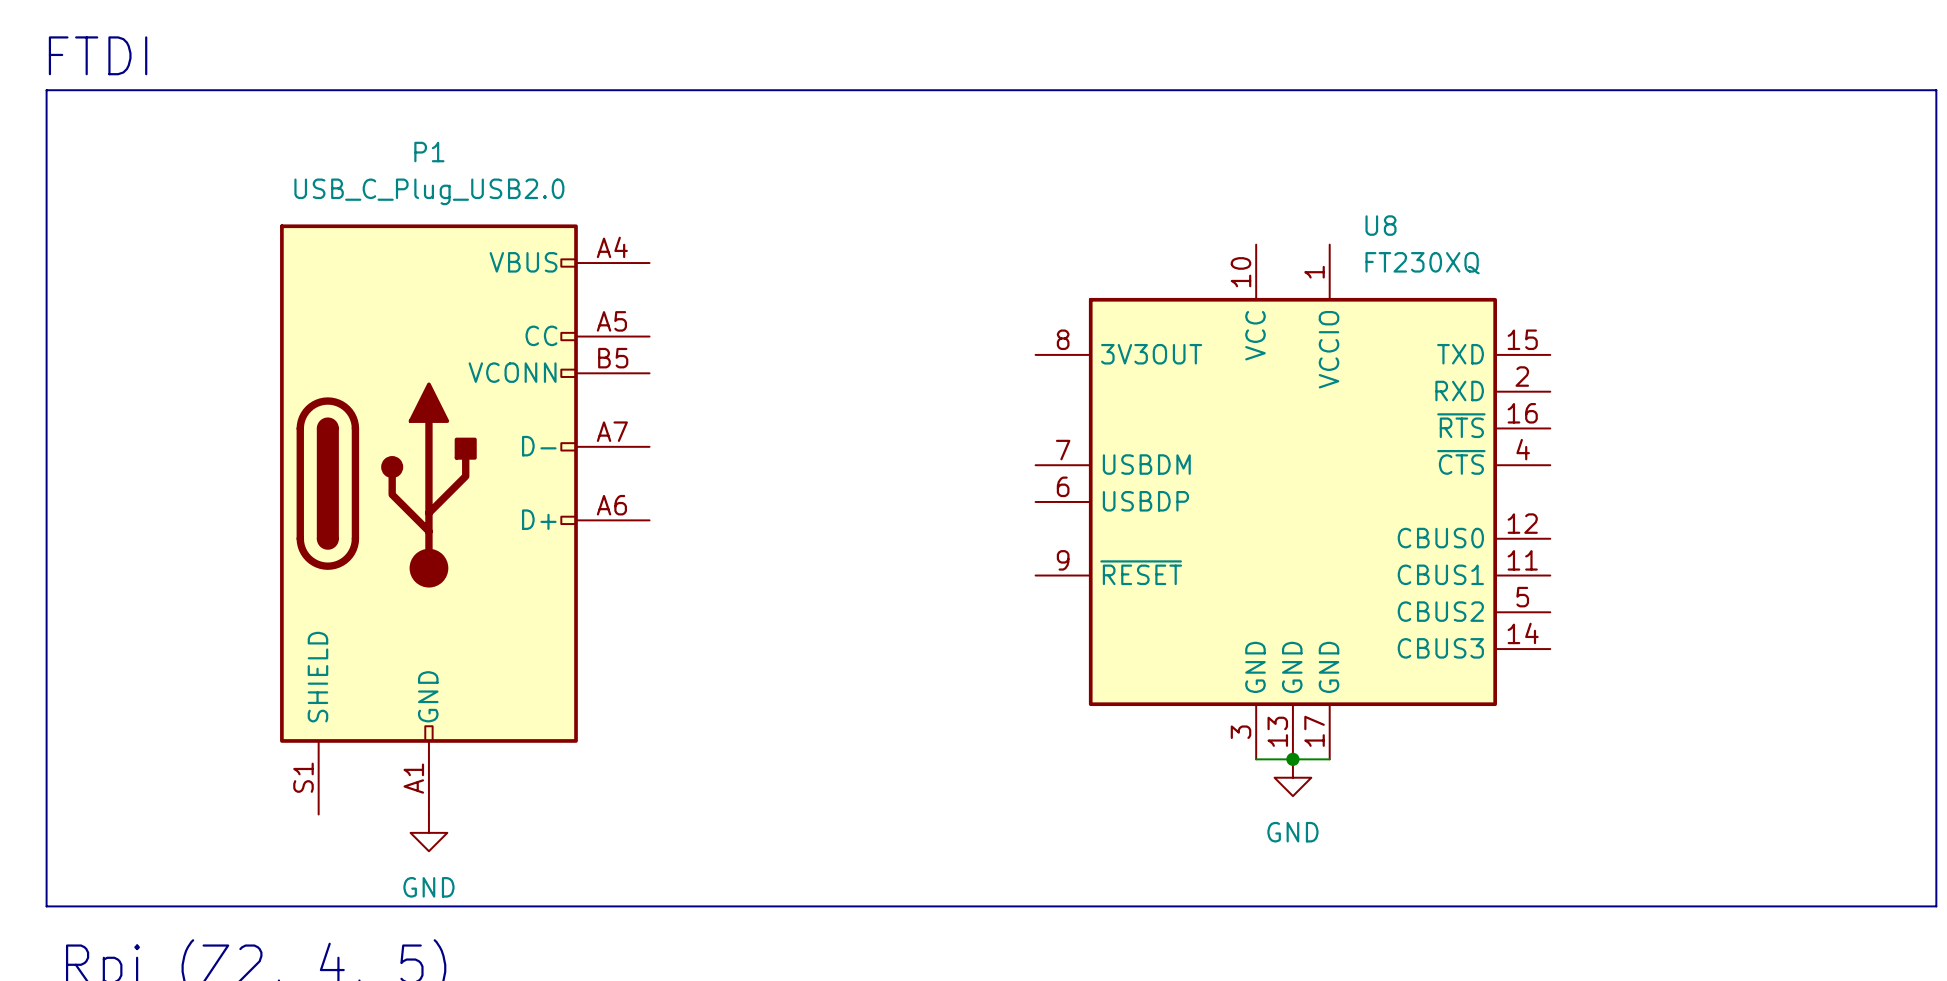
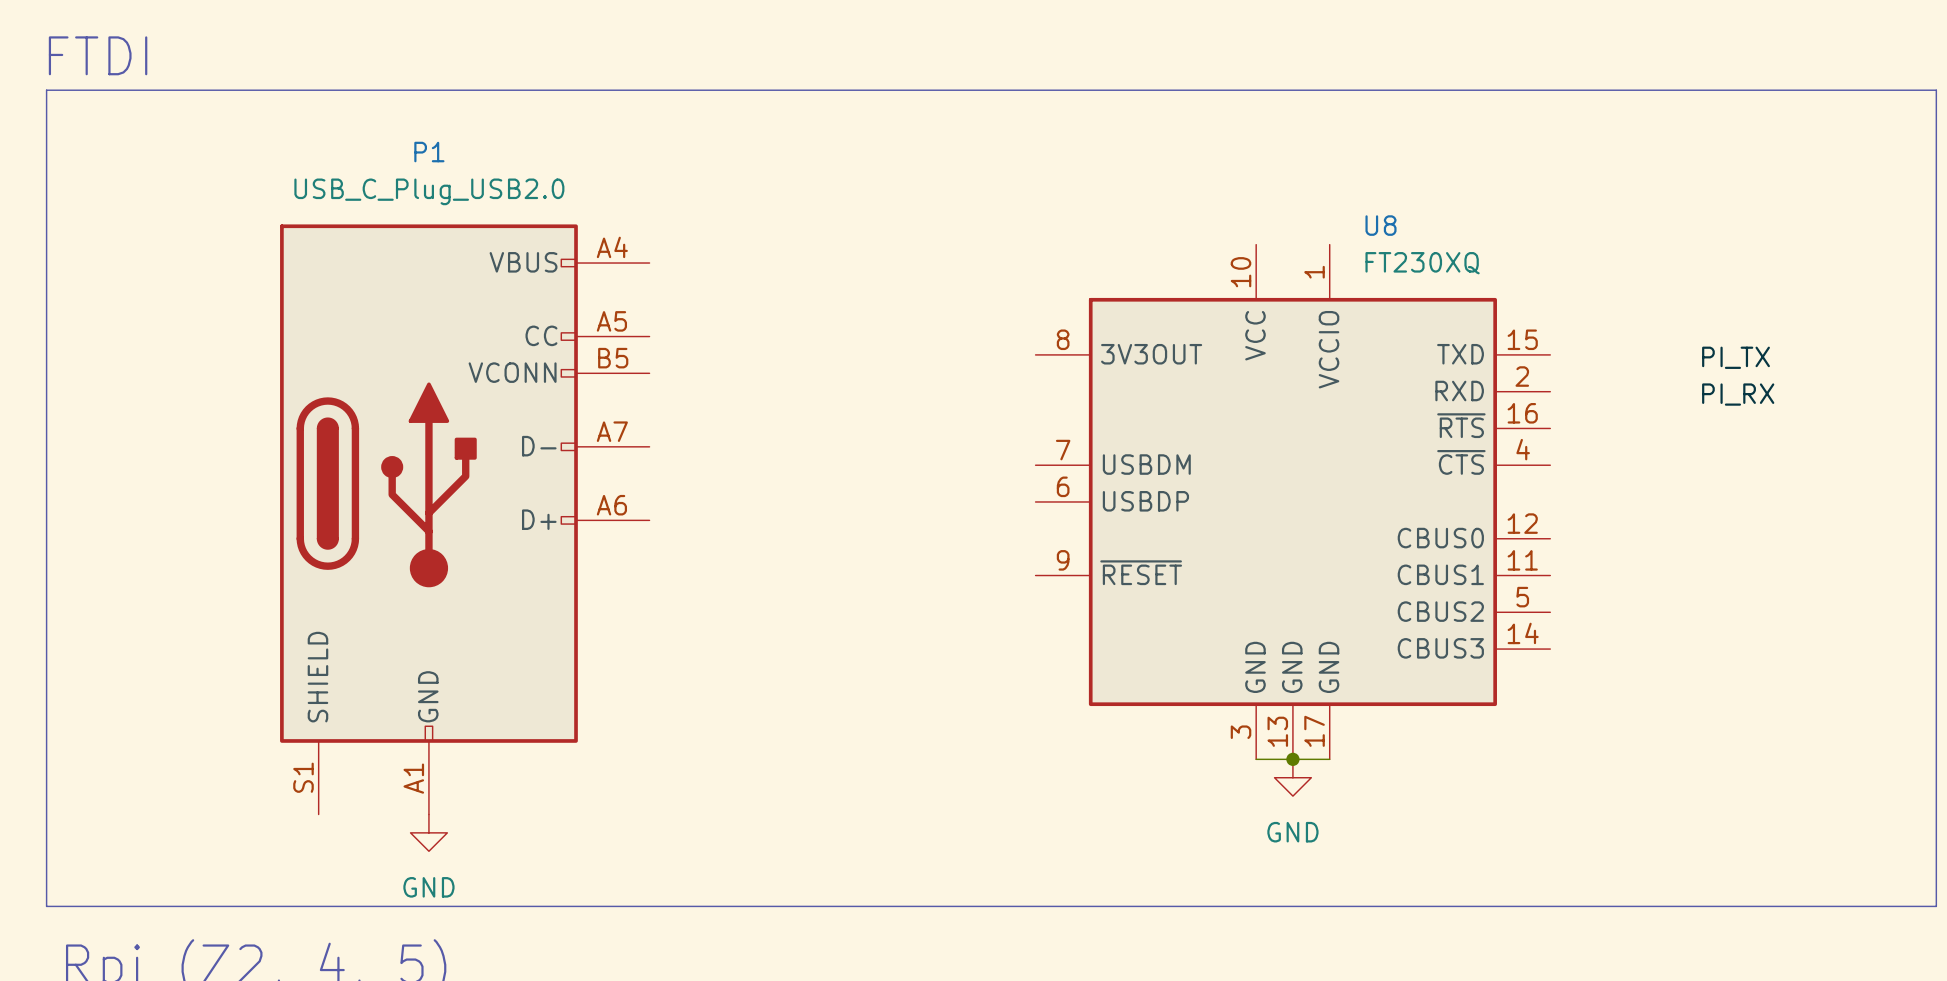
label: none -> PI_TX (1736, 357)
label: none -> PI_RX (1738, 394)

